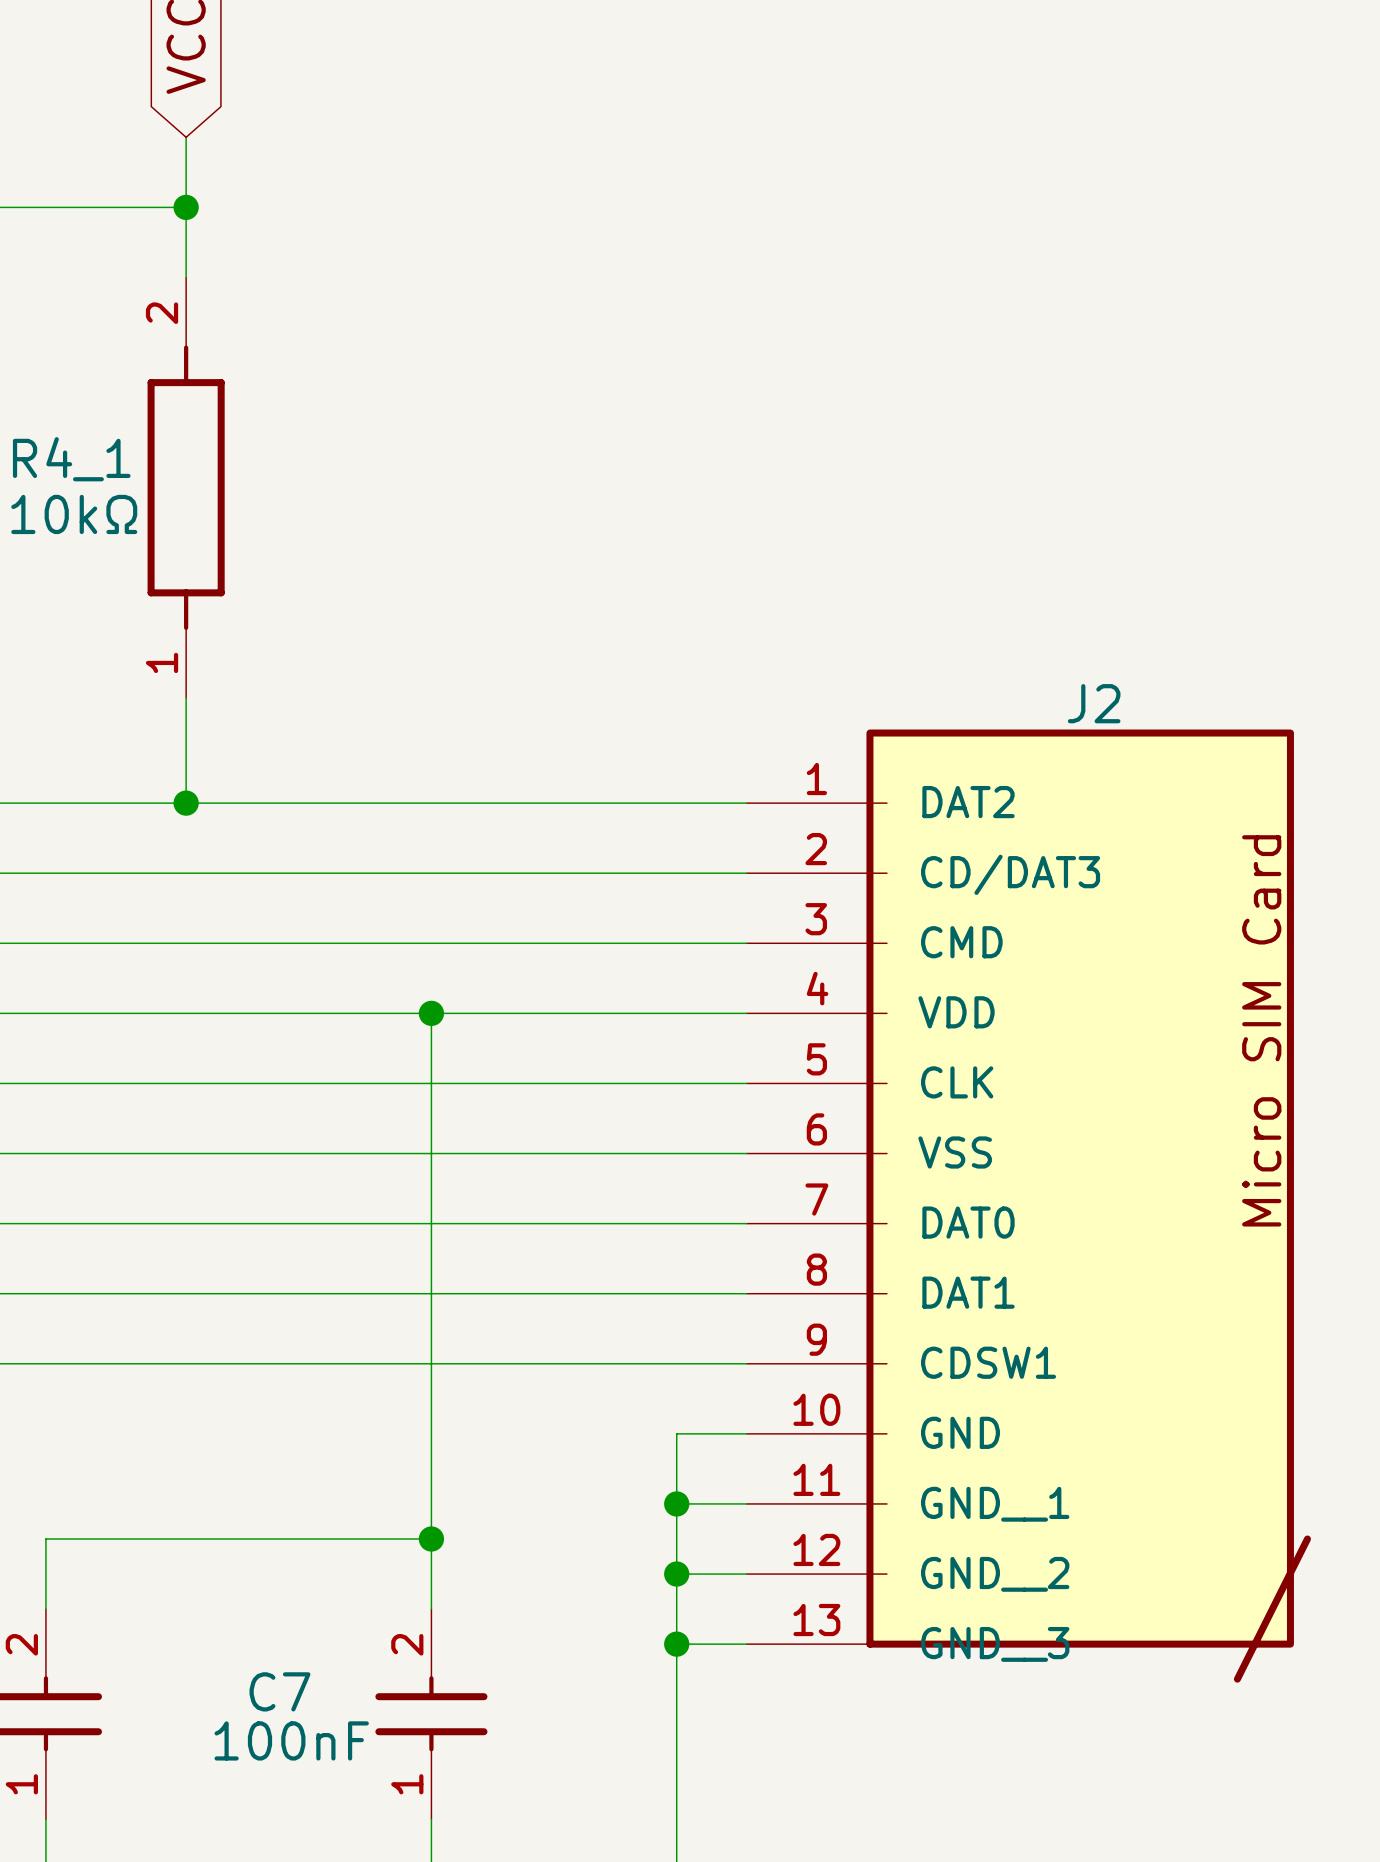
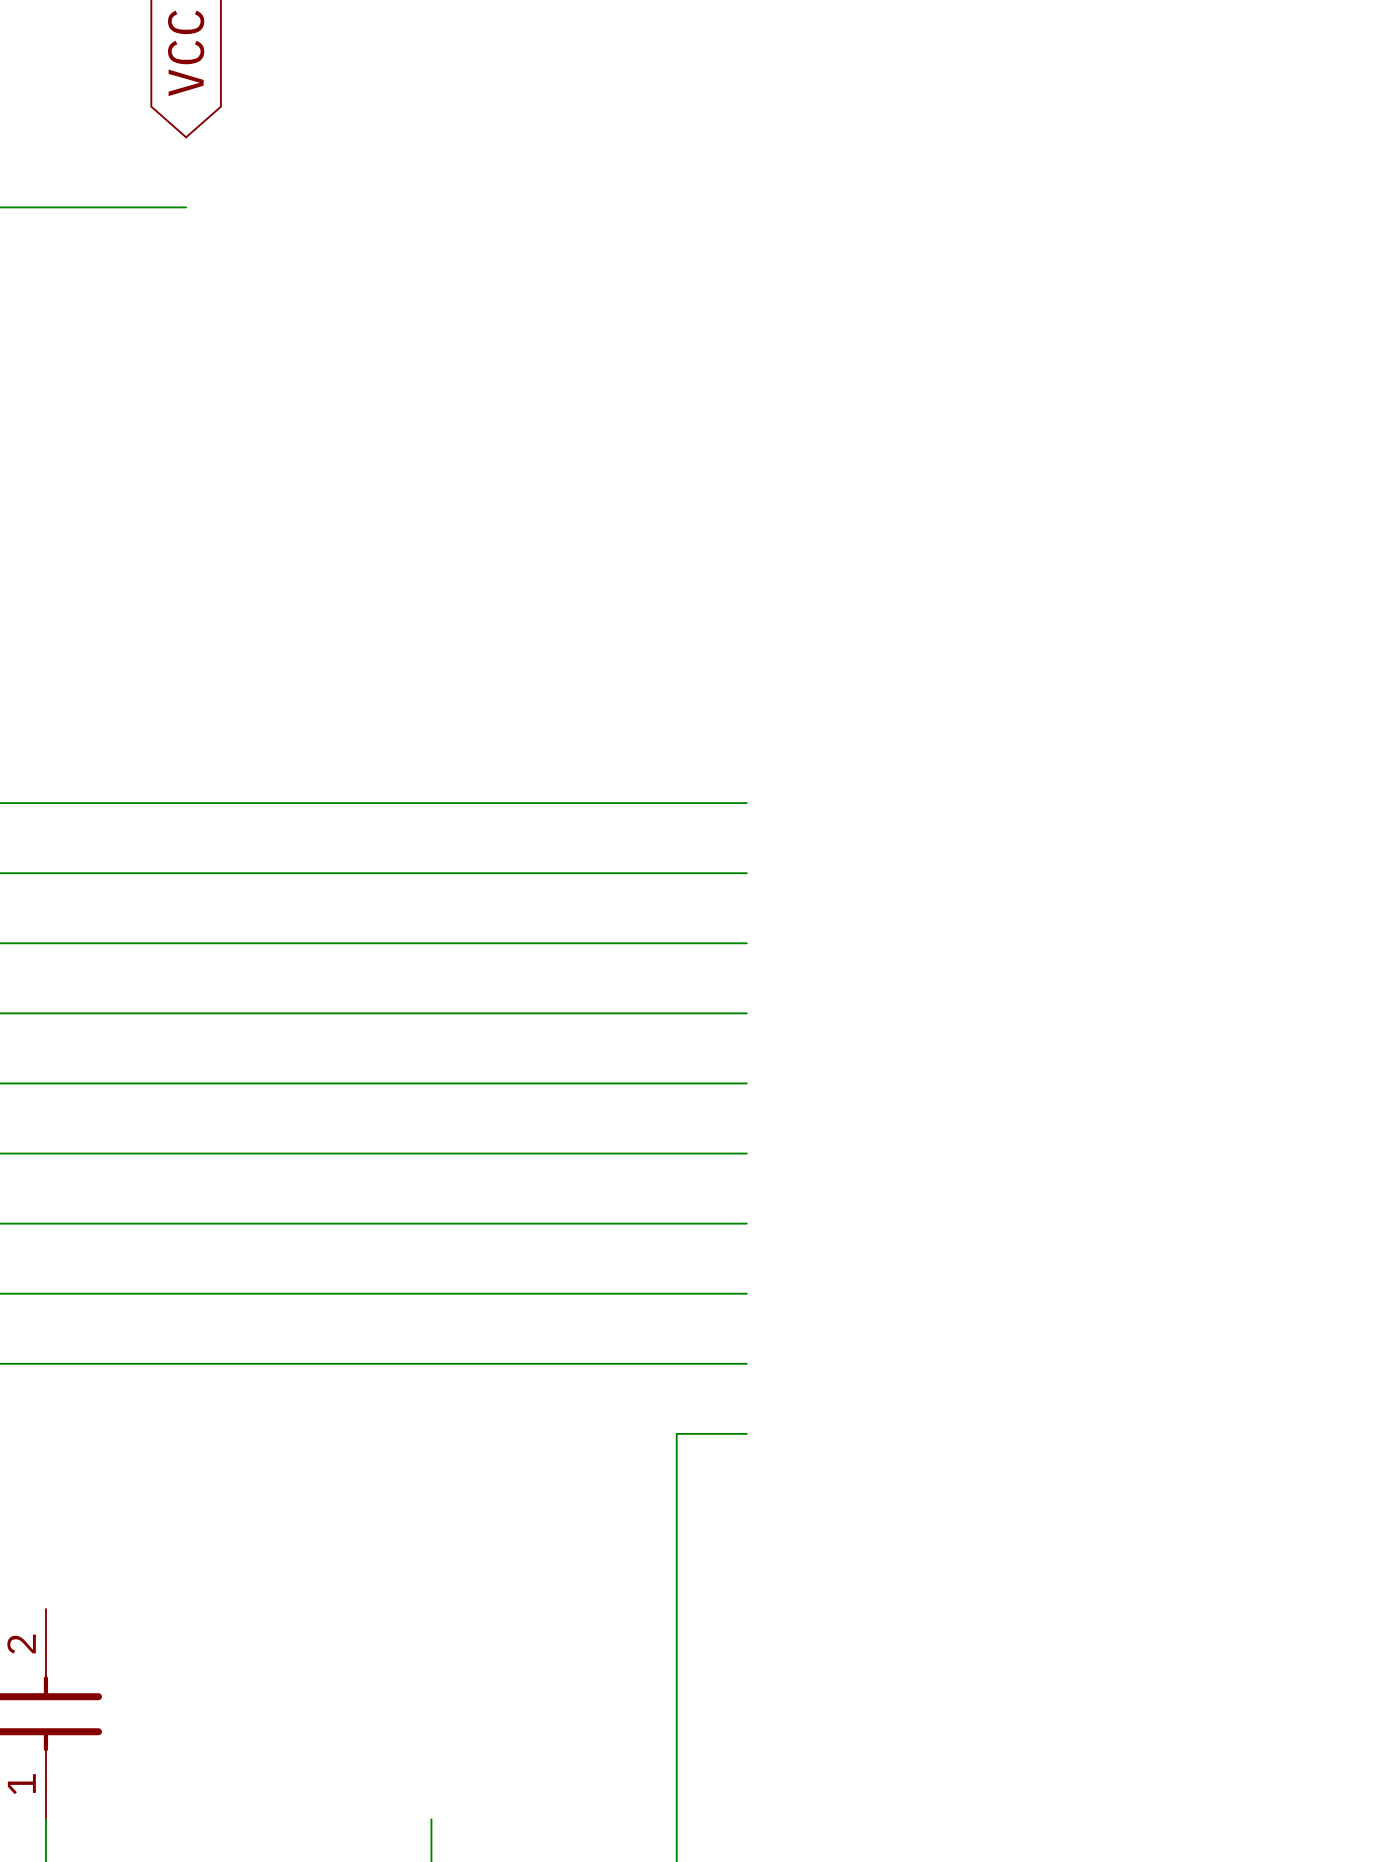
wire: (186, 137) (186, 277) -> none
junction: (186, 207) -> none
R4_1: 10kΩ (186, 487) -> none
wire: (186, 697) (186, 803) -> none
junction: (186, 803) -> none
wire: (431, 1013) (431, 1609) -> none
junction: (431, 1013) -> none
J2: (1028, 1206) -> none
wire: (676, 1503) (746, 1503) -> none
junction: (676, 1503) -> none
wire: (431, 1539) (45, 1539) (45, 1609) -> none
junction: (431, 1539) -> none
wire: (676, 1574) (746, 1574) -> none
junction: (676, 1574) -> none
wire: (676, 1644) (746, 1644) -> none
junction: (676, 1644) -> none
C7: 100nF (431, 1714) -> none

